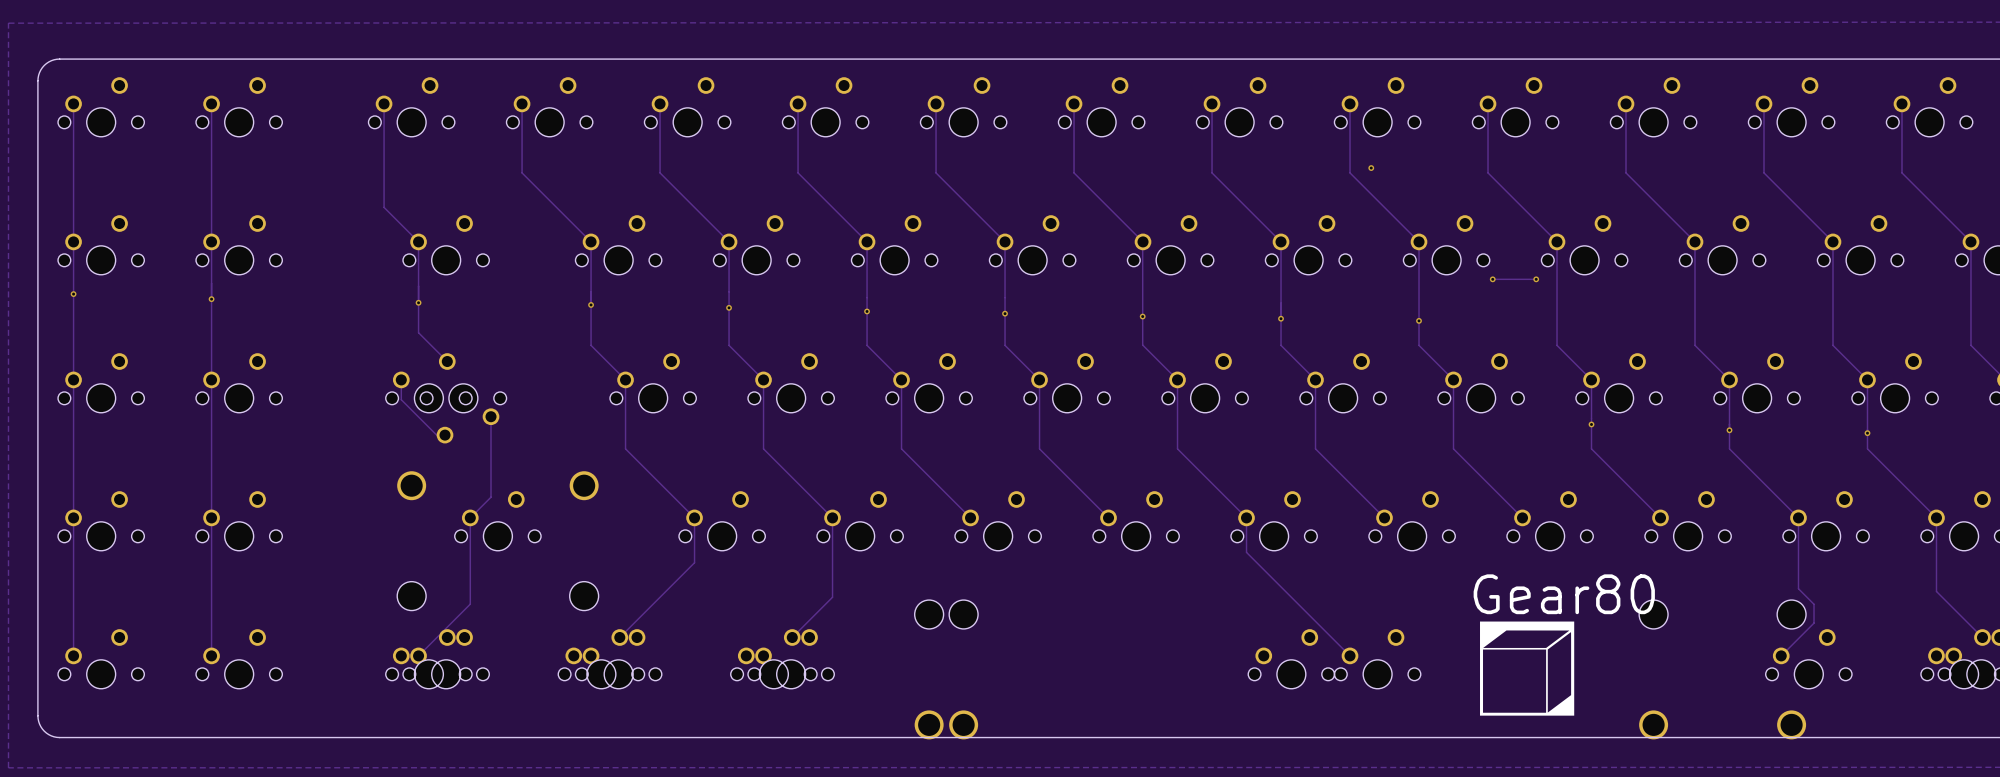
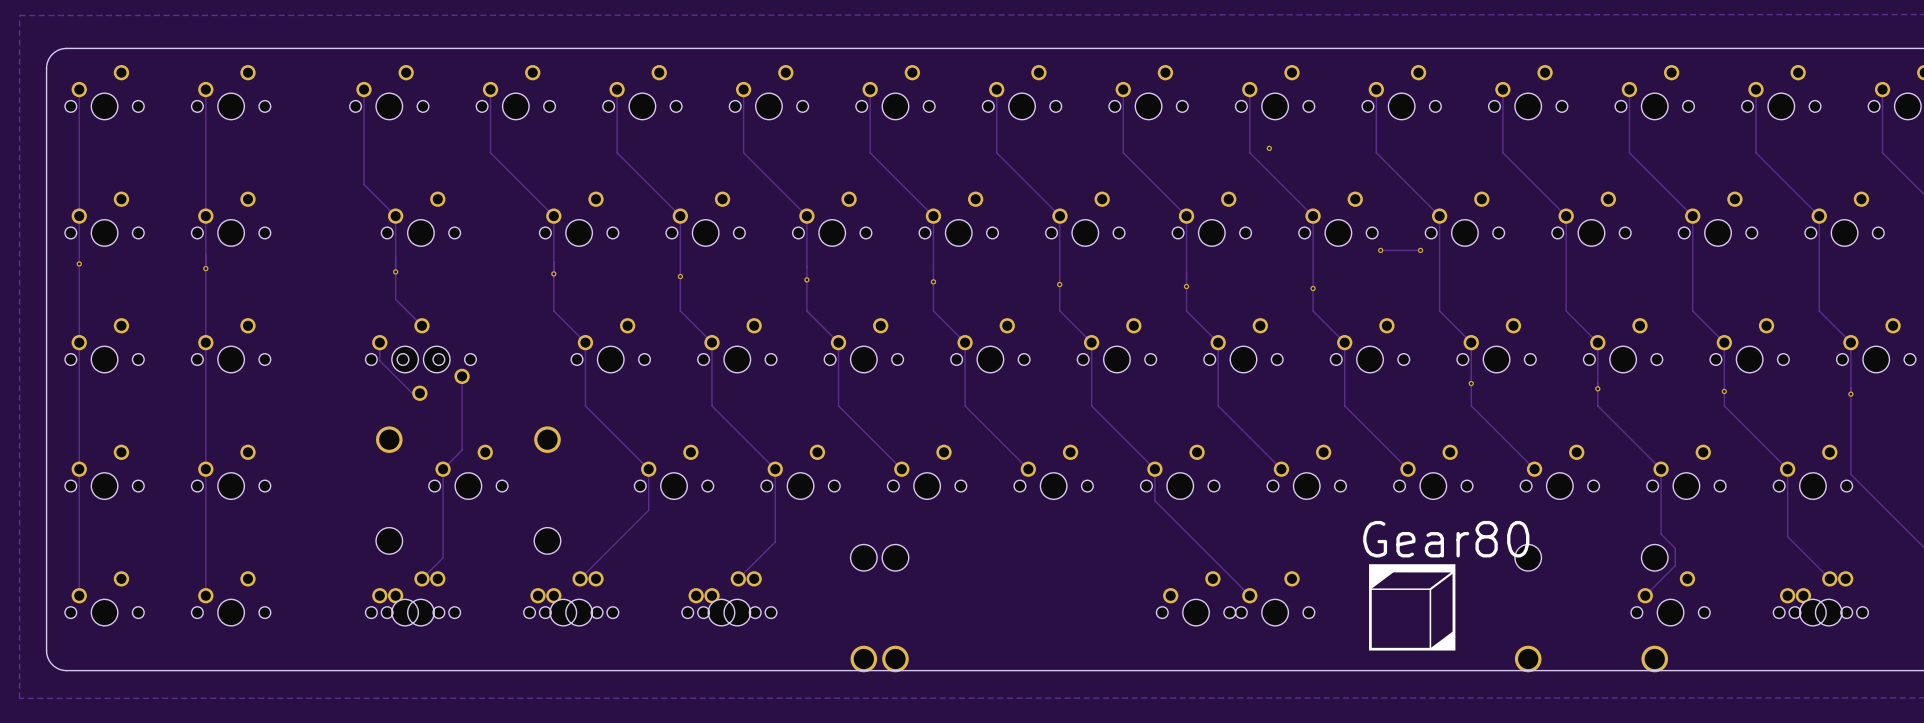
track: (470, 604) (418, 655) -> (443, 548) (443, 557) (421, 578)

